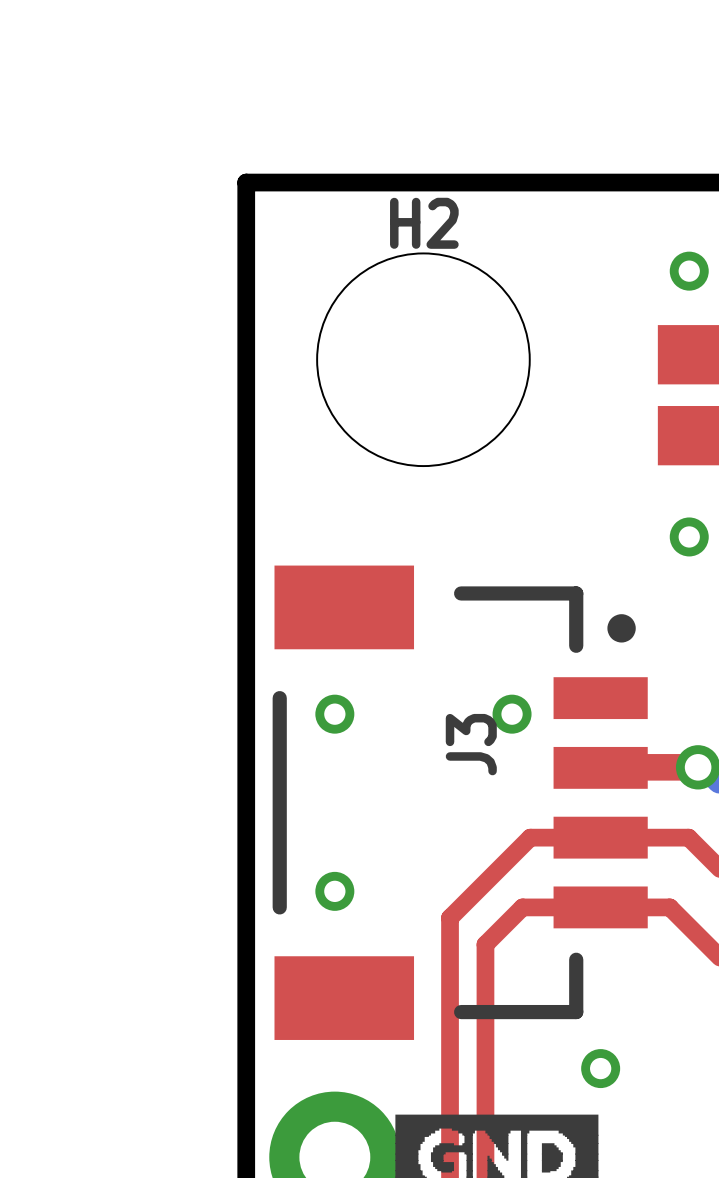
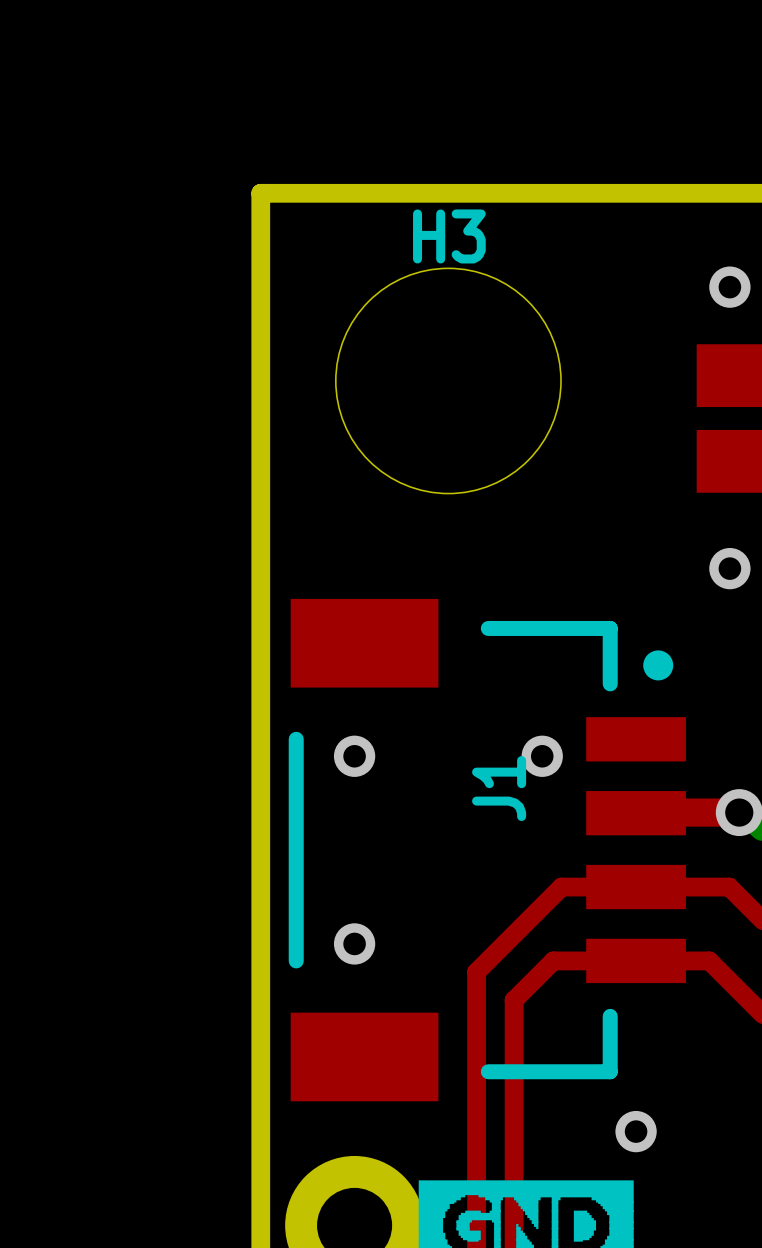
H2 name: H2 (424, 223) -> H3 (449, 236)
J3 name: J3 (471, 744) -> J1 (499, 788)

